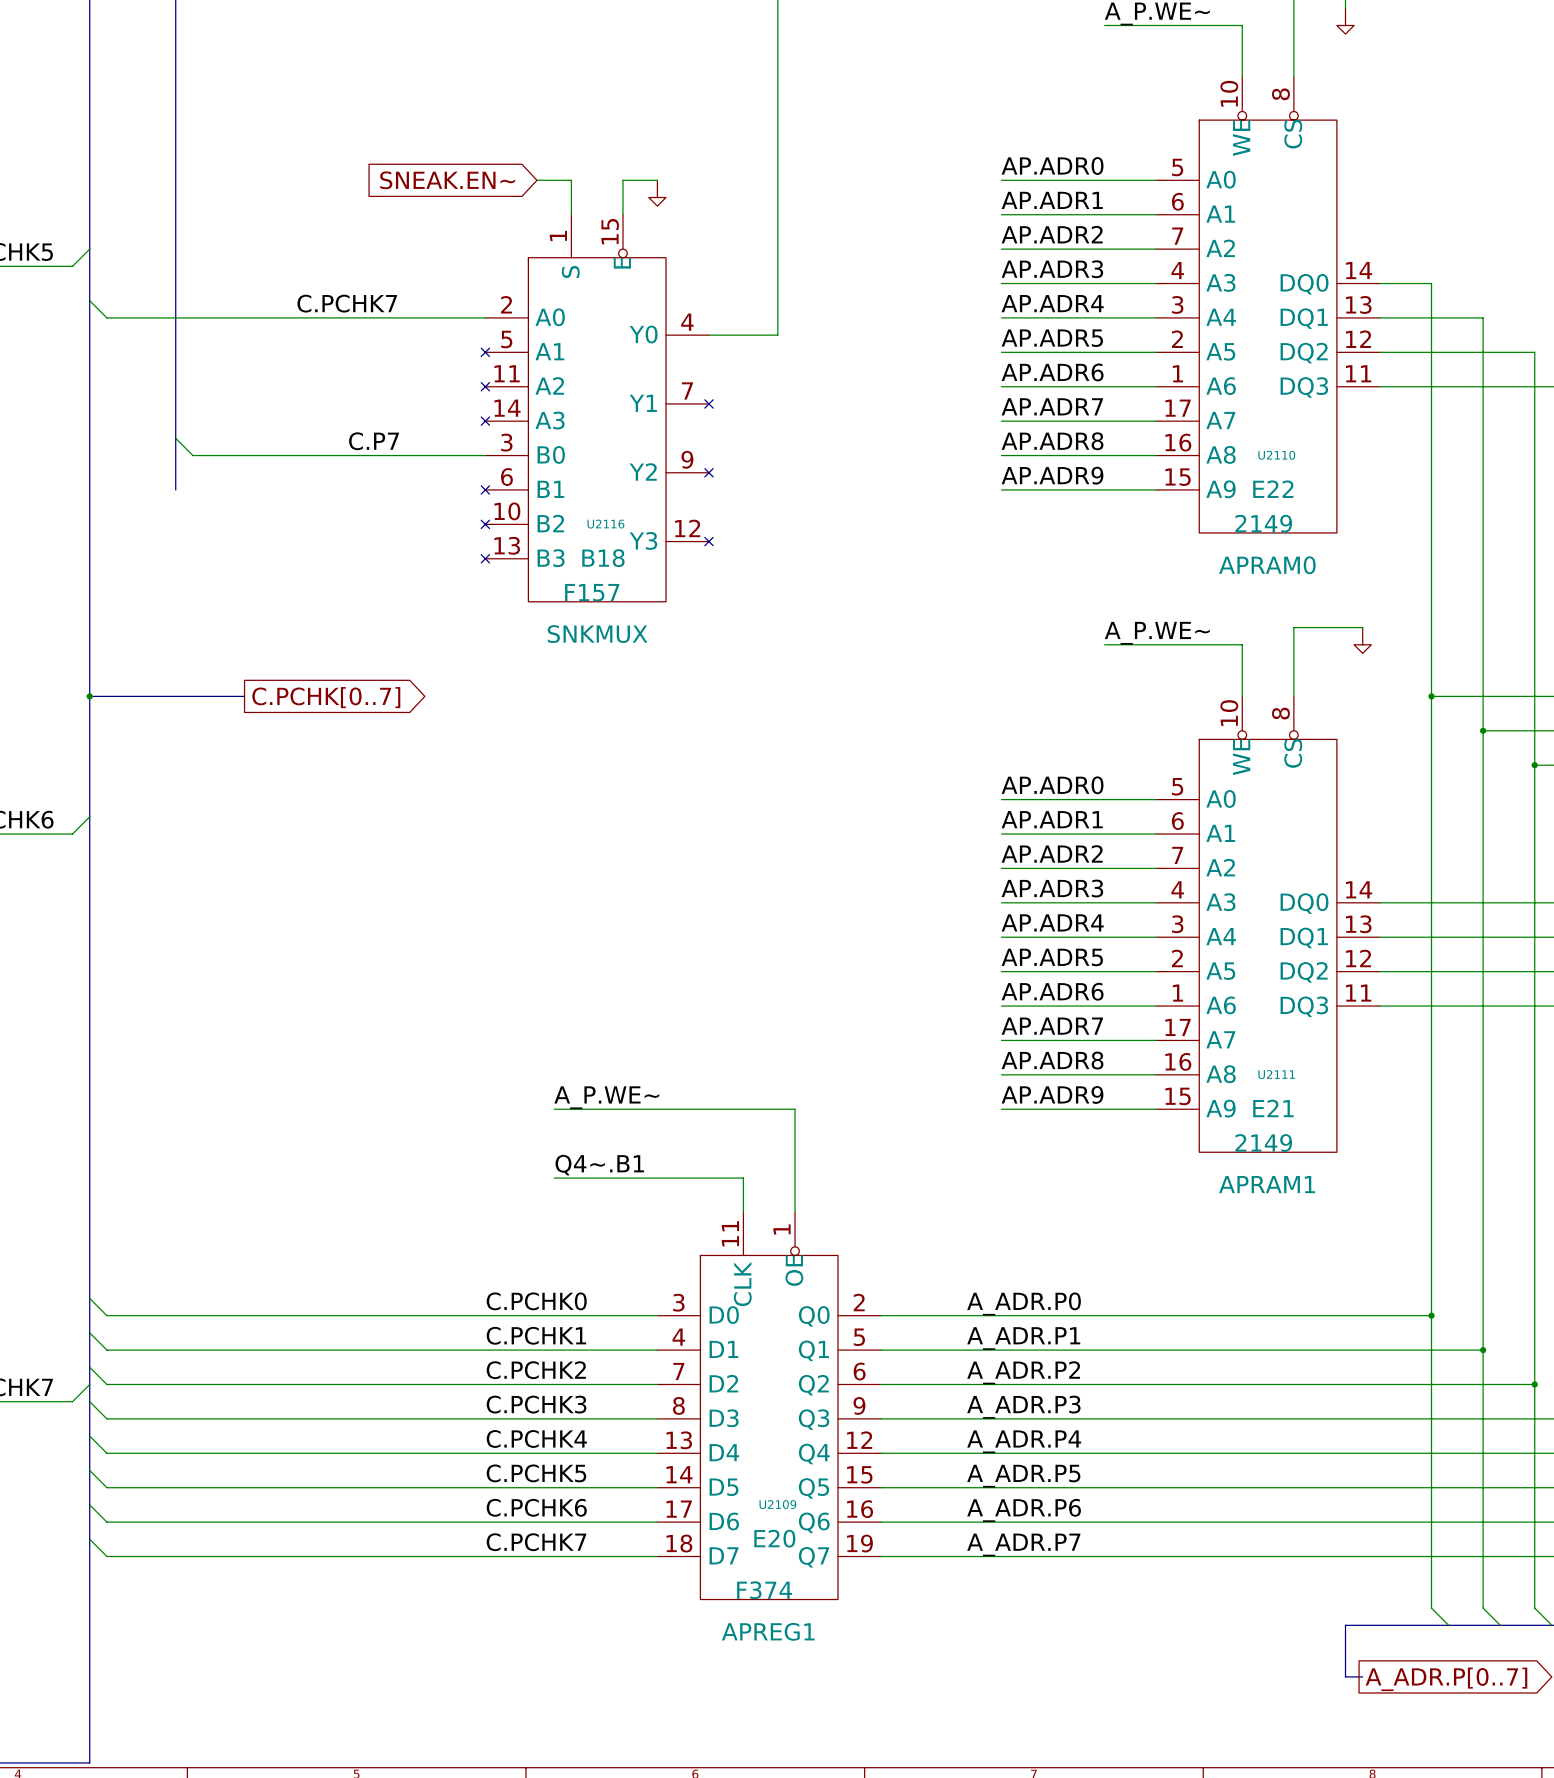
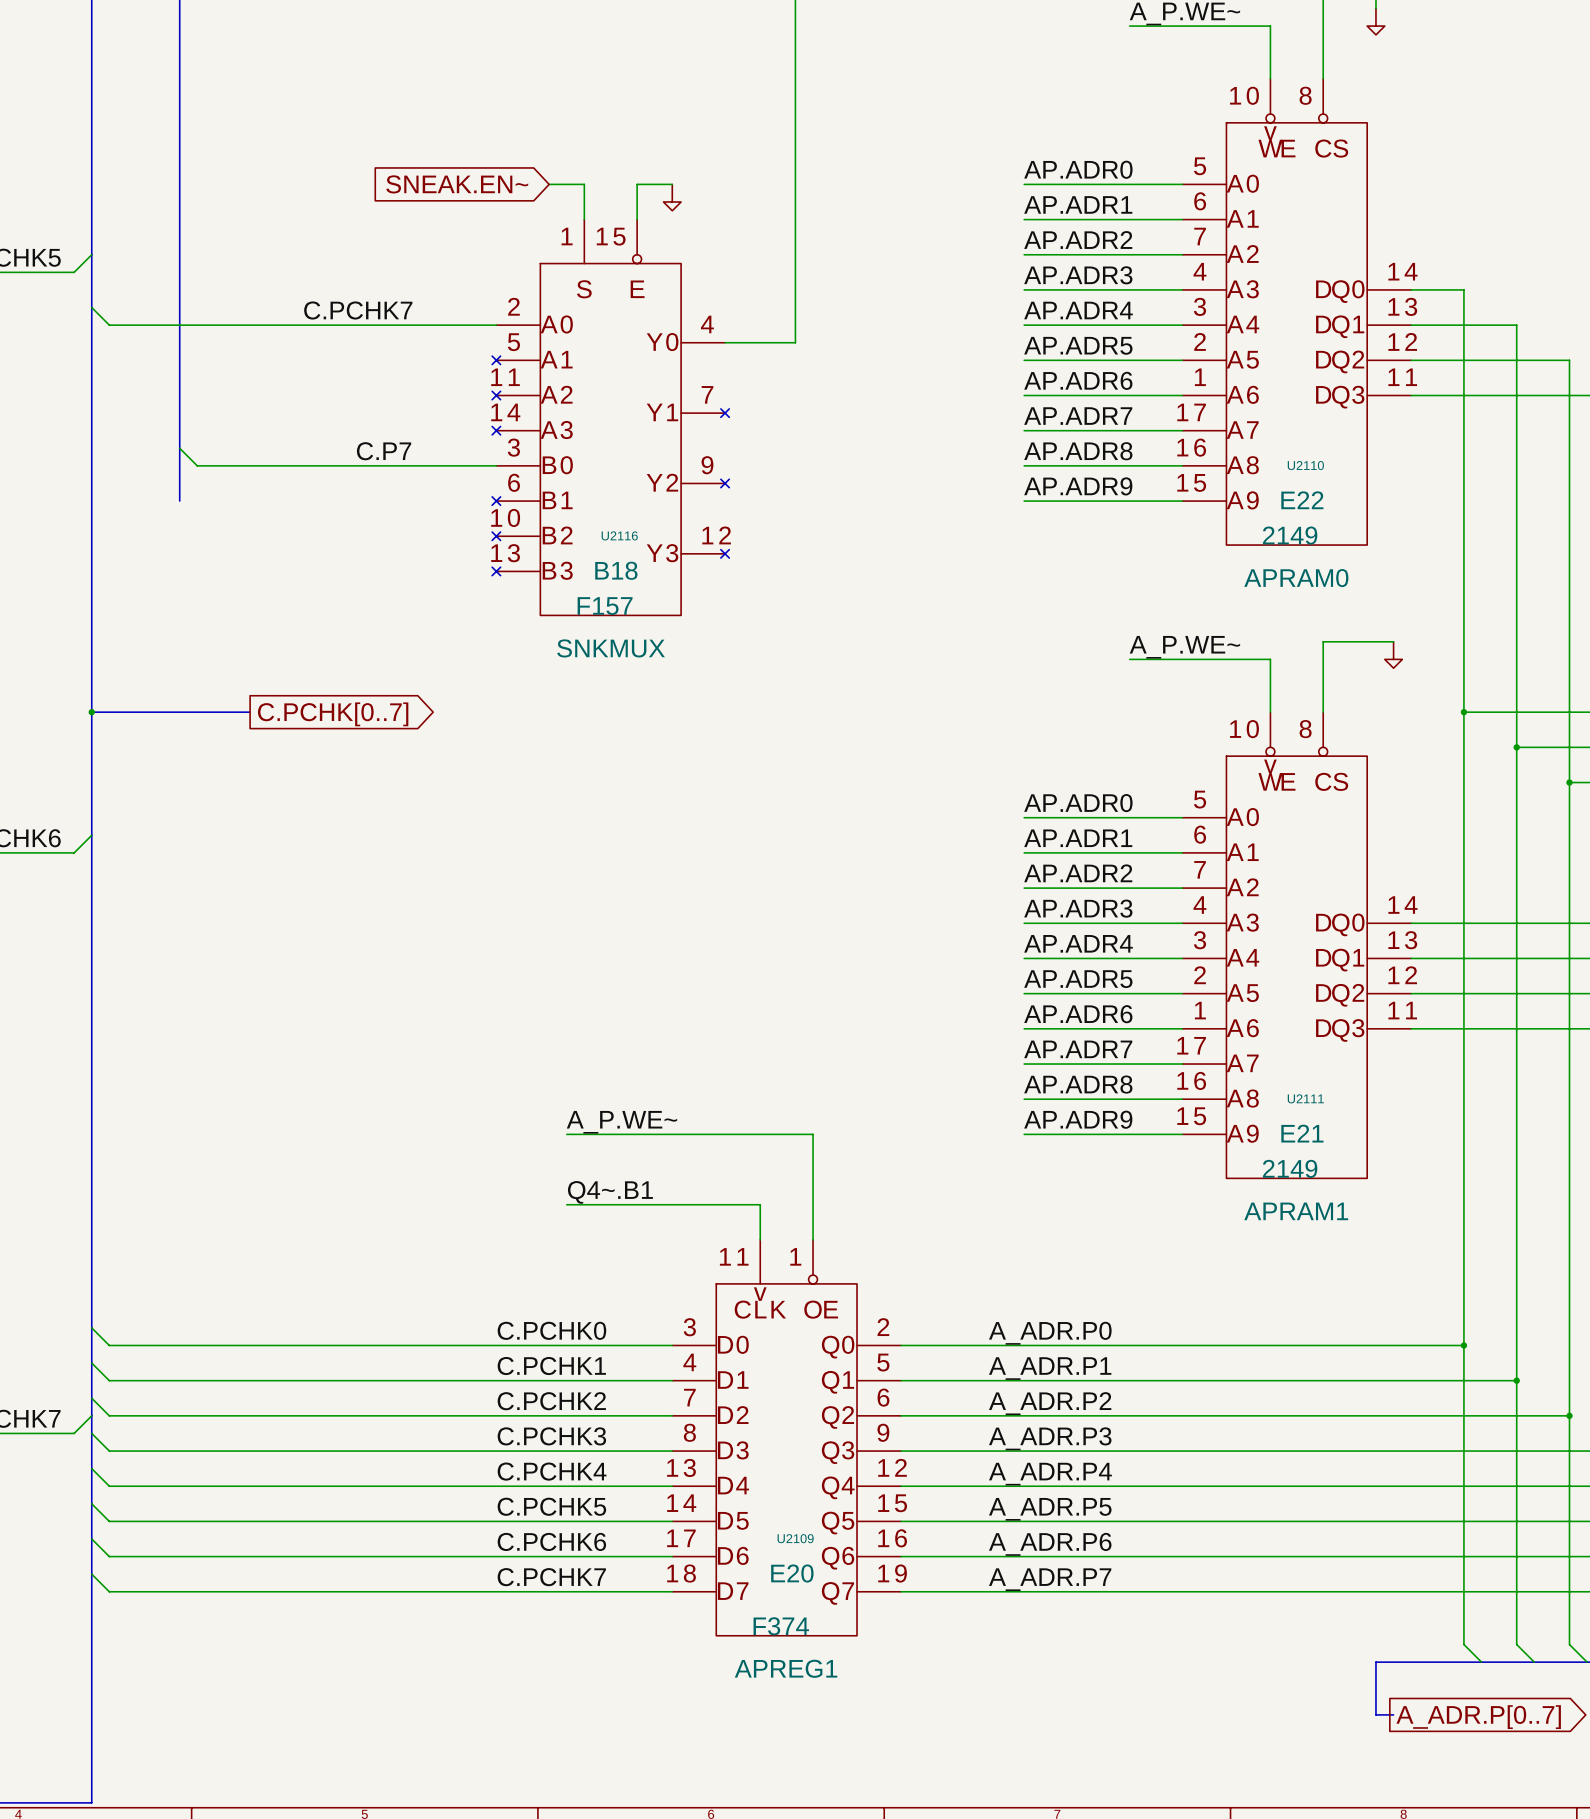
U2110 symbol: [1156, 77, 1380, 533] -> [1182, 78, 1412, 546]
U2116 symbol: [485, 214, 710, 602] -> [496, 219, 726, 616]
U2111 symbol: [1156, 696, 1380, 1153] -> [1182, 712, 1412, 1179]
U2109 symbol: [657, 1212, 882, 1600] -> [672, 1239, 901, 1636]

